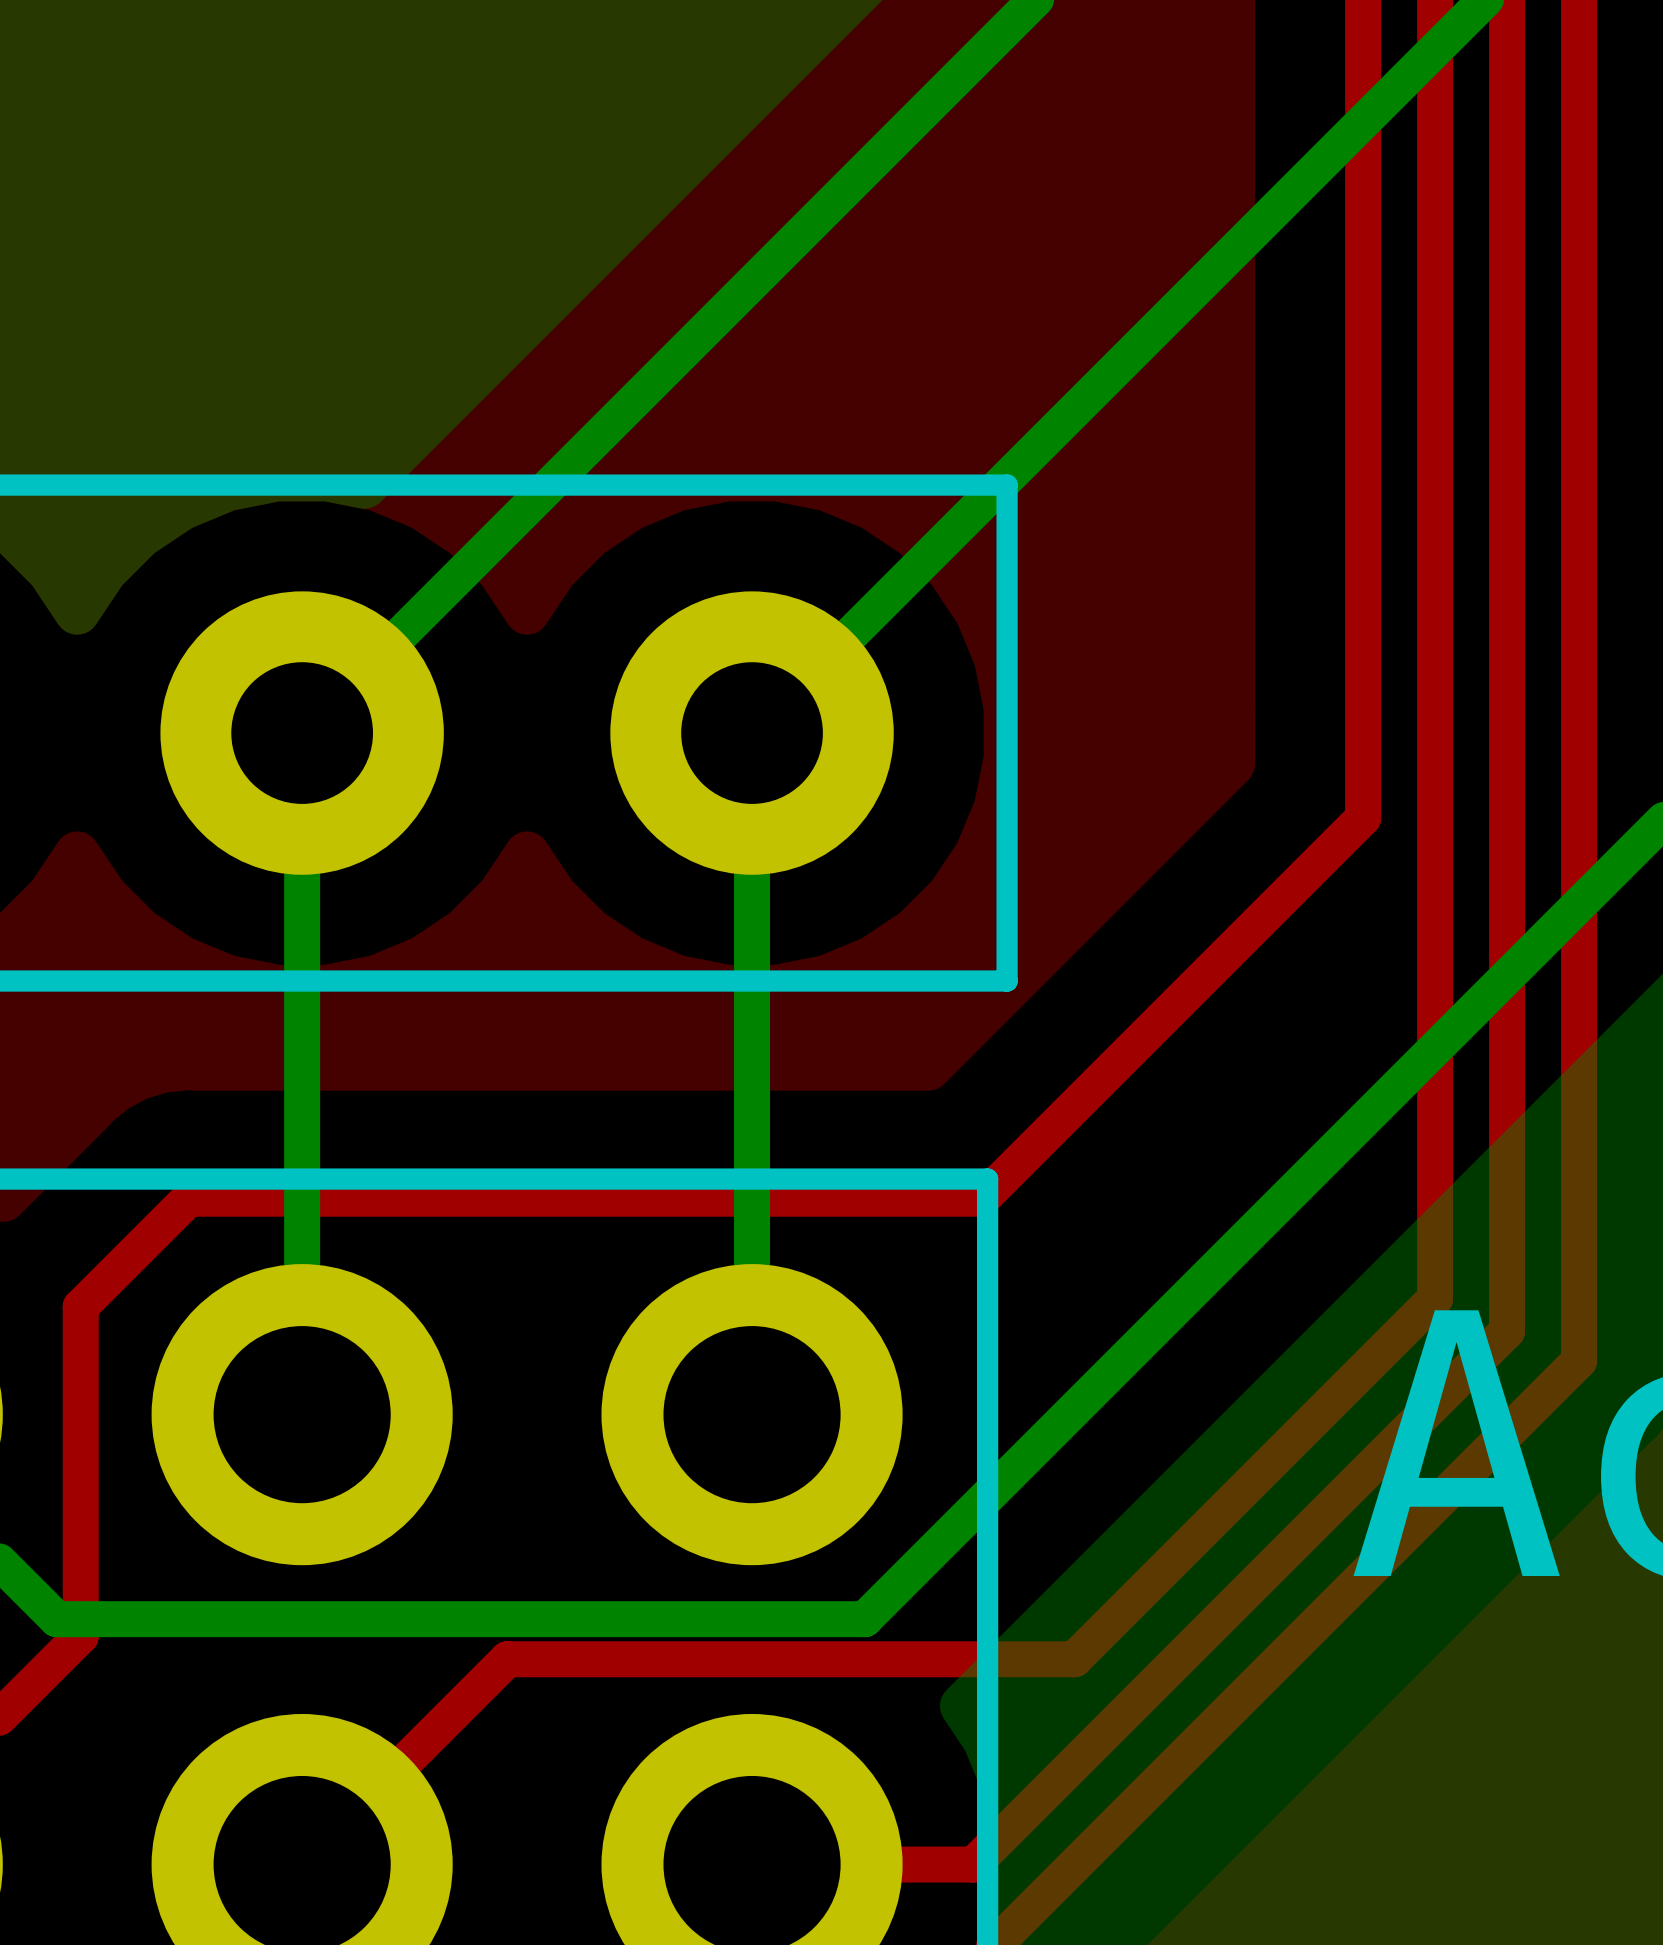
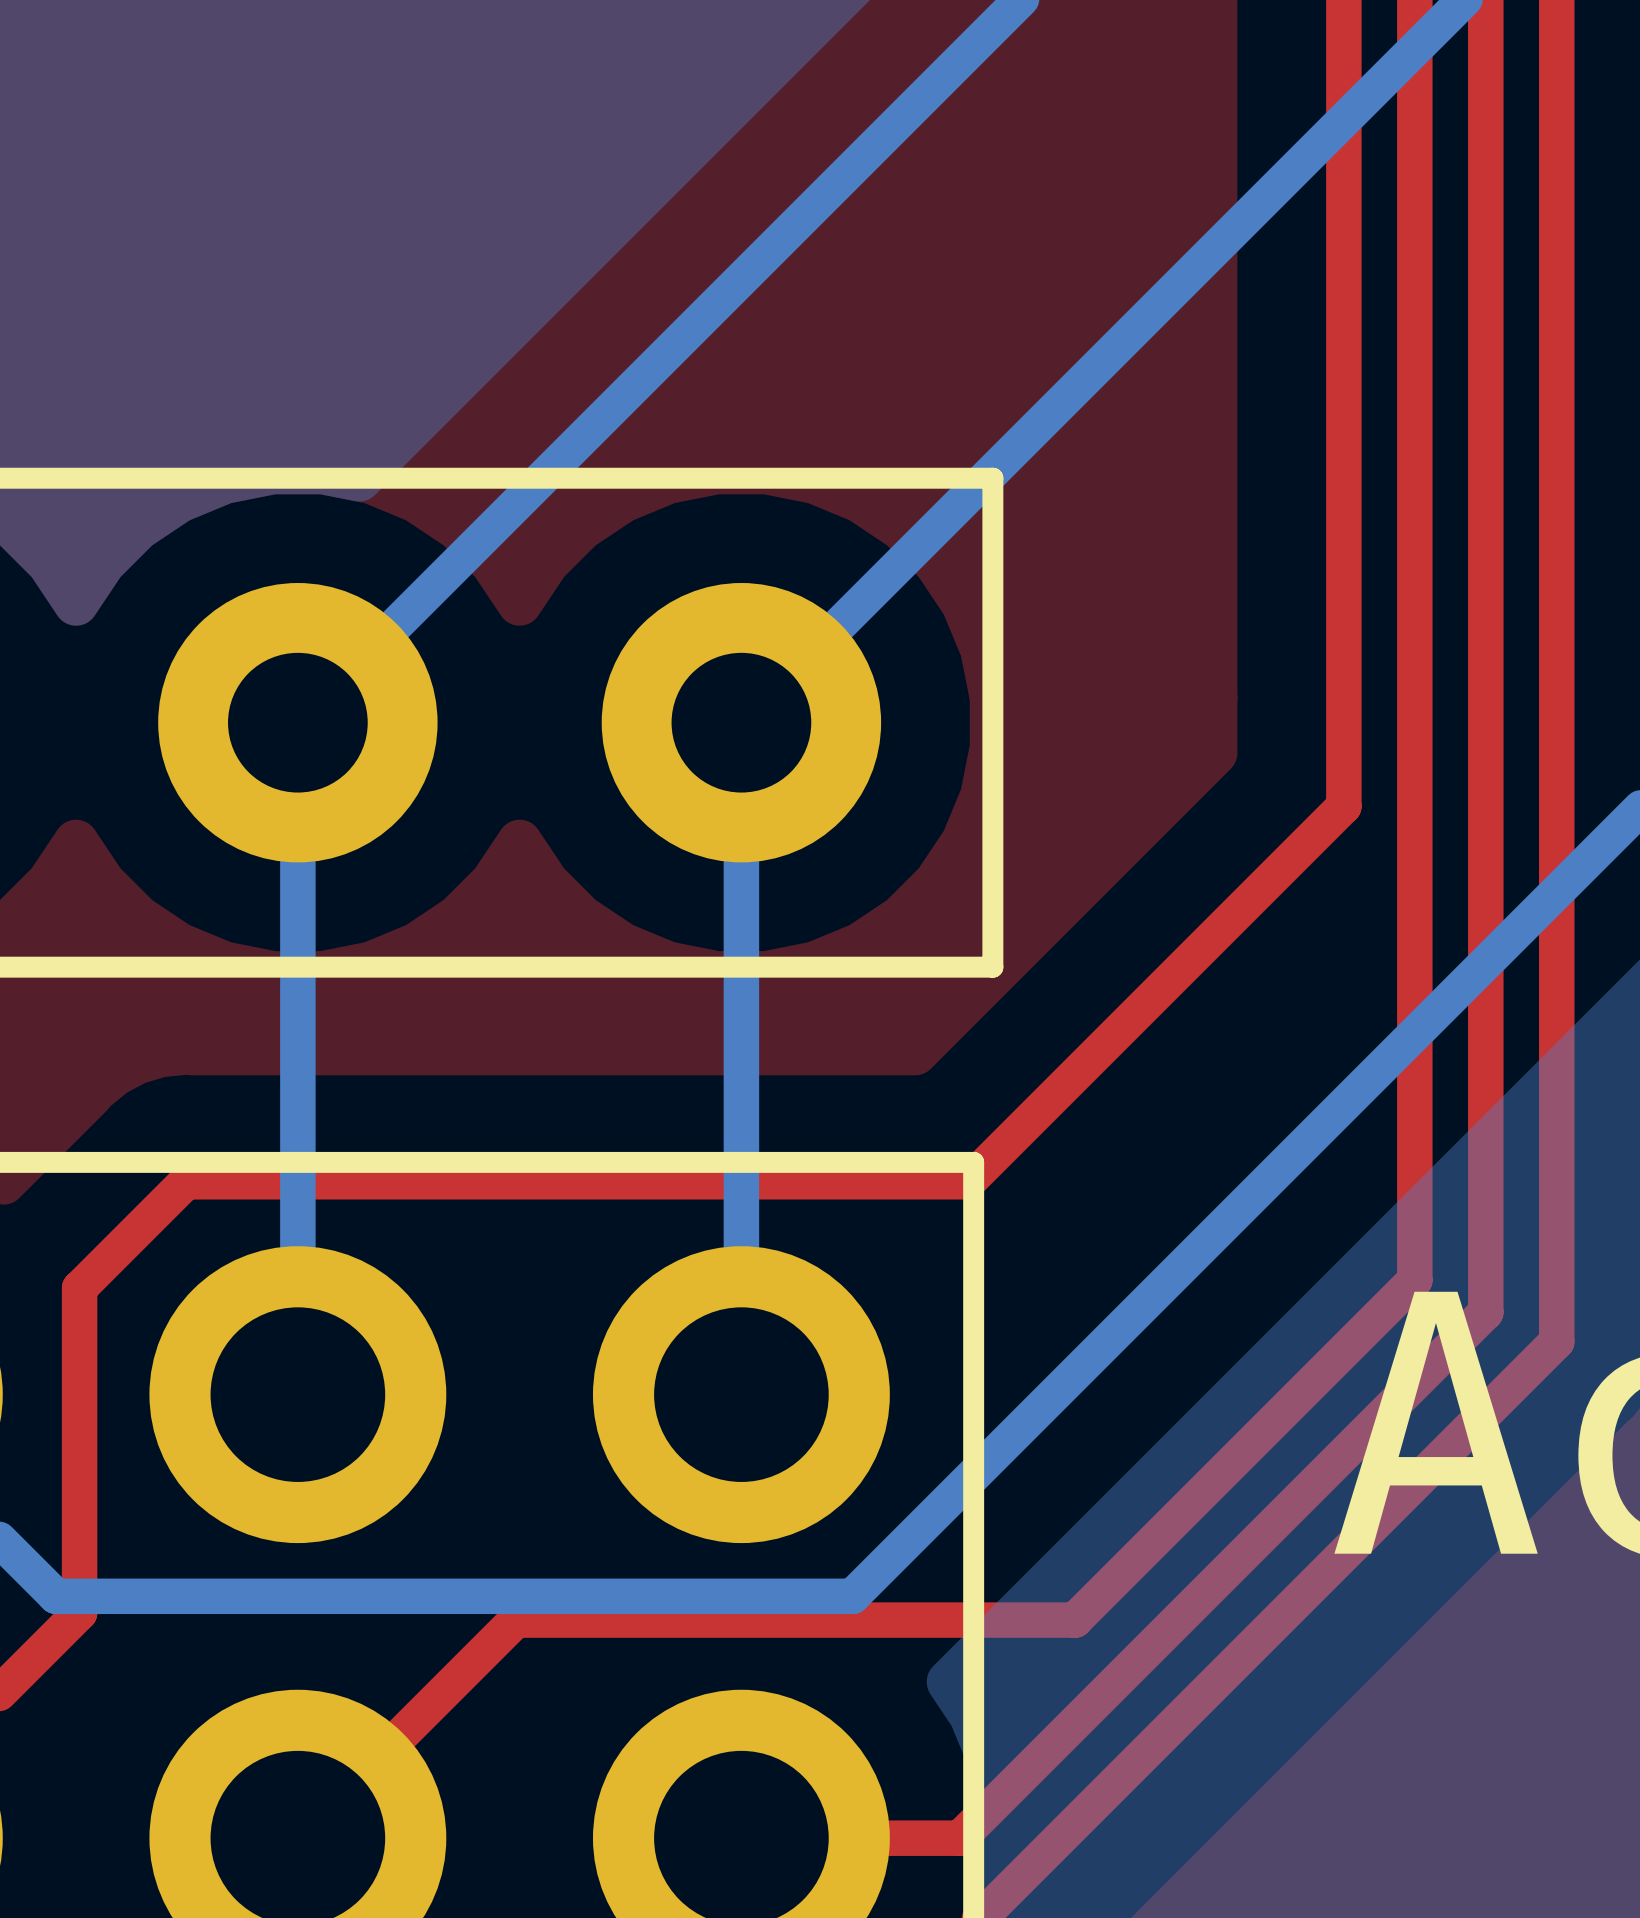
top track: (1090, 1643) (1074, 1659) (507, 1659) -> (1074, 1620) (515, 1620) (500, 1635)

